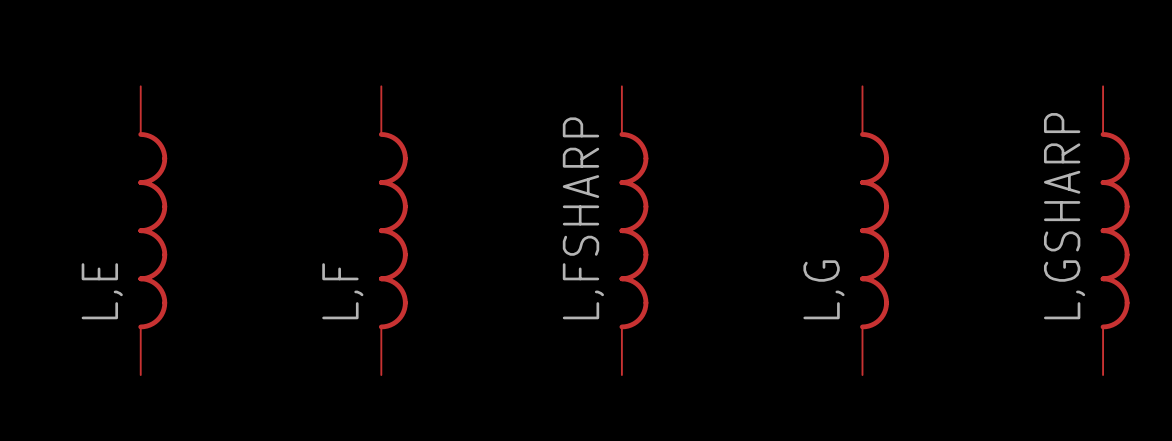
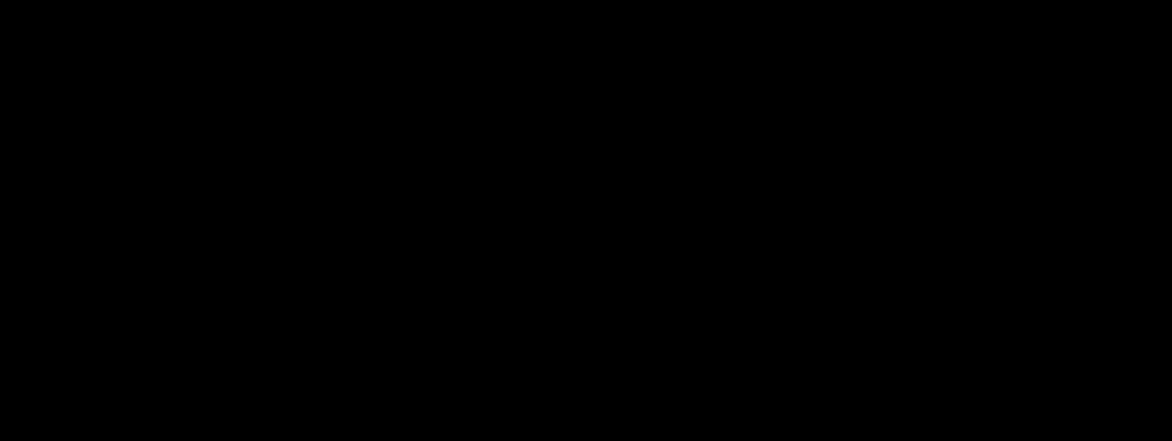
L,E: (152, 230) -> none
L,F: (393, 230) -> none
L,FSHARP: (633, 230) -> none
L,G: (874, 230) -> none
L,GSHARP: (1115, 230) -> none

